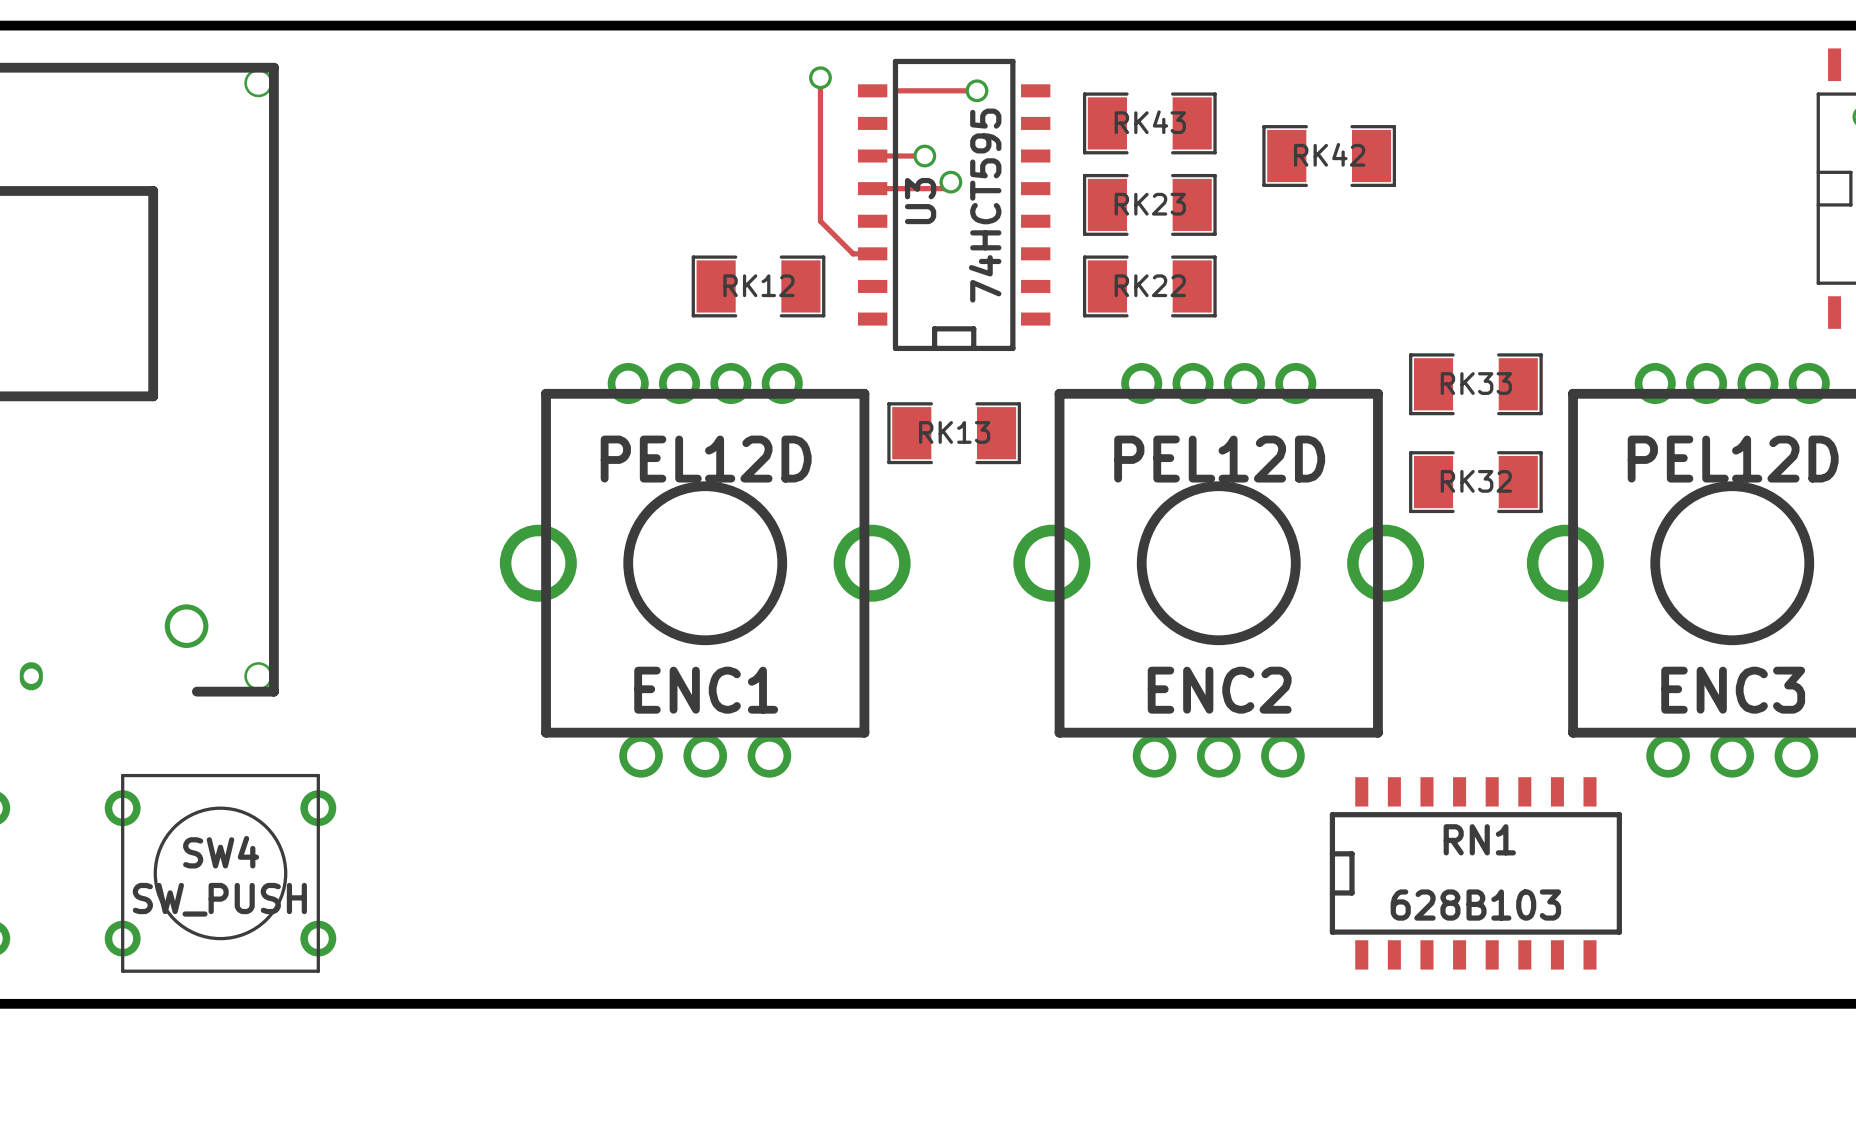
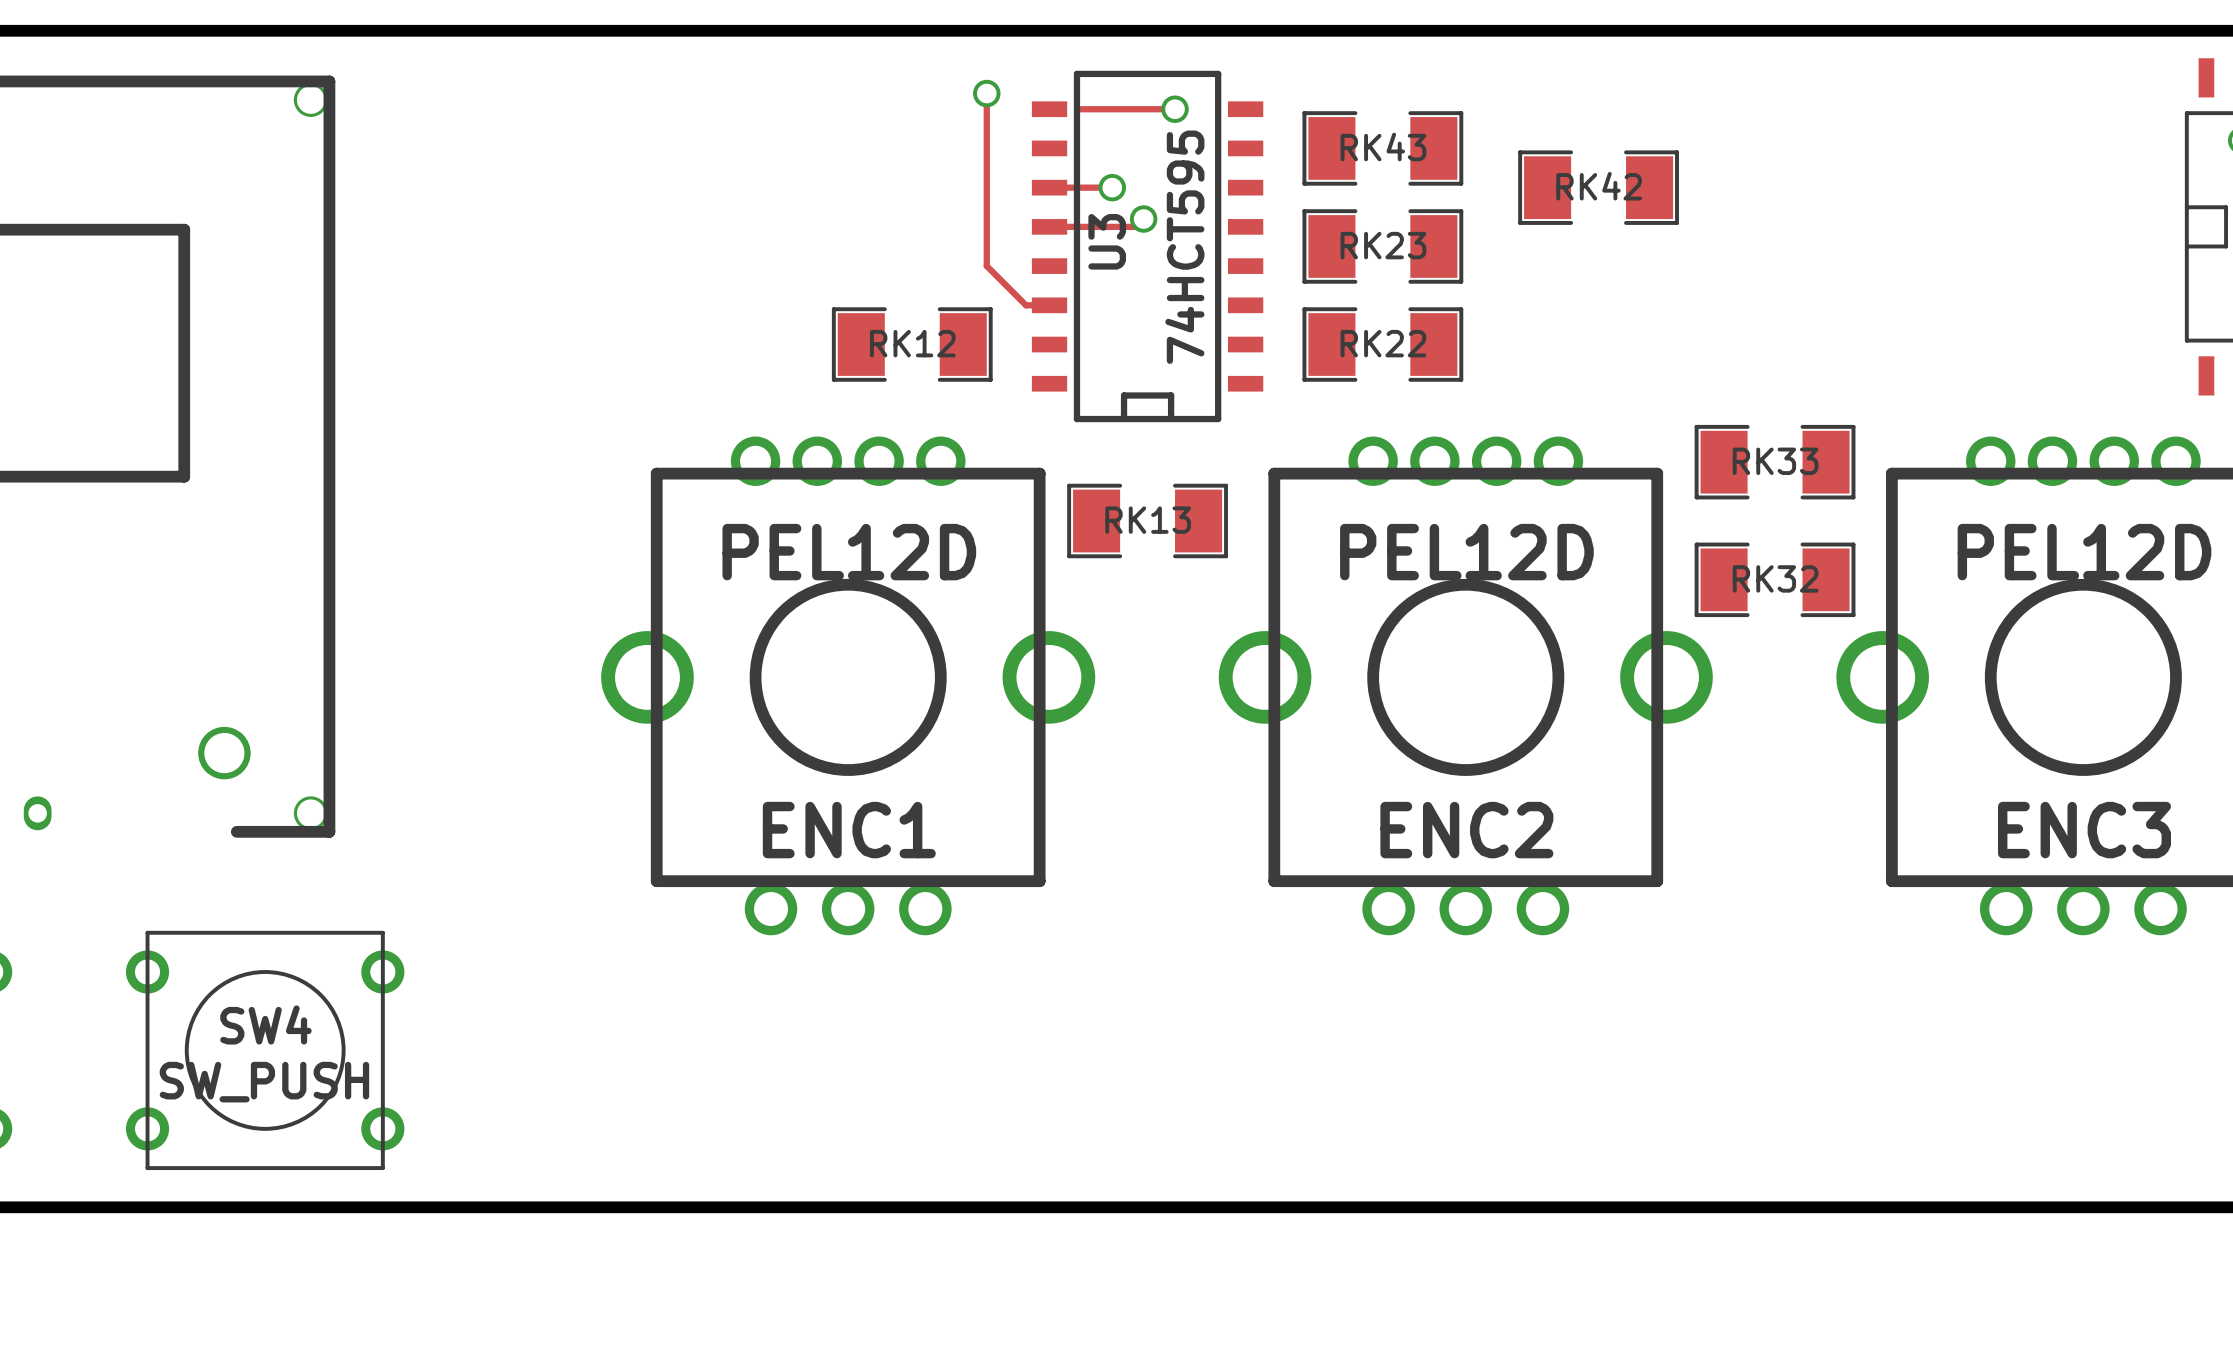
RN1: 628B103 (1475, 873) -> none

